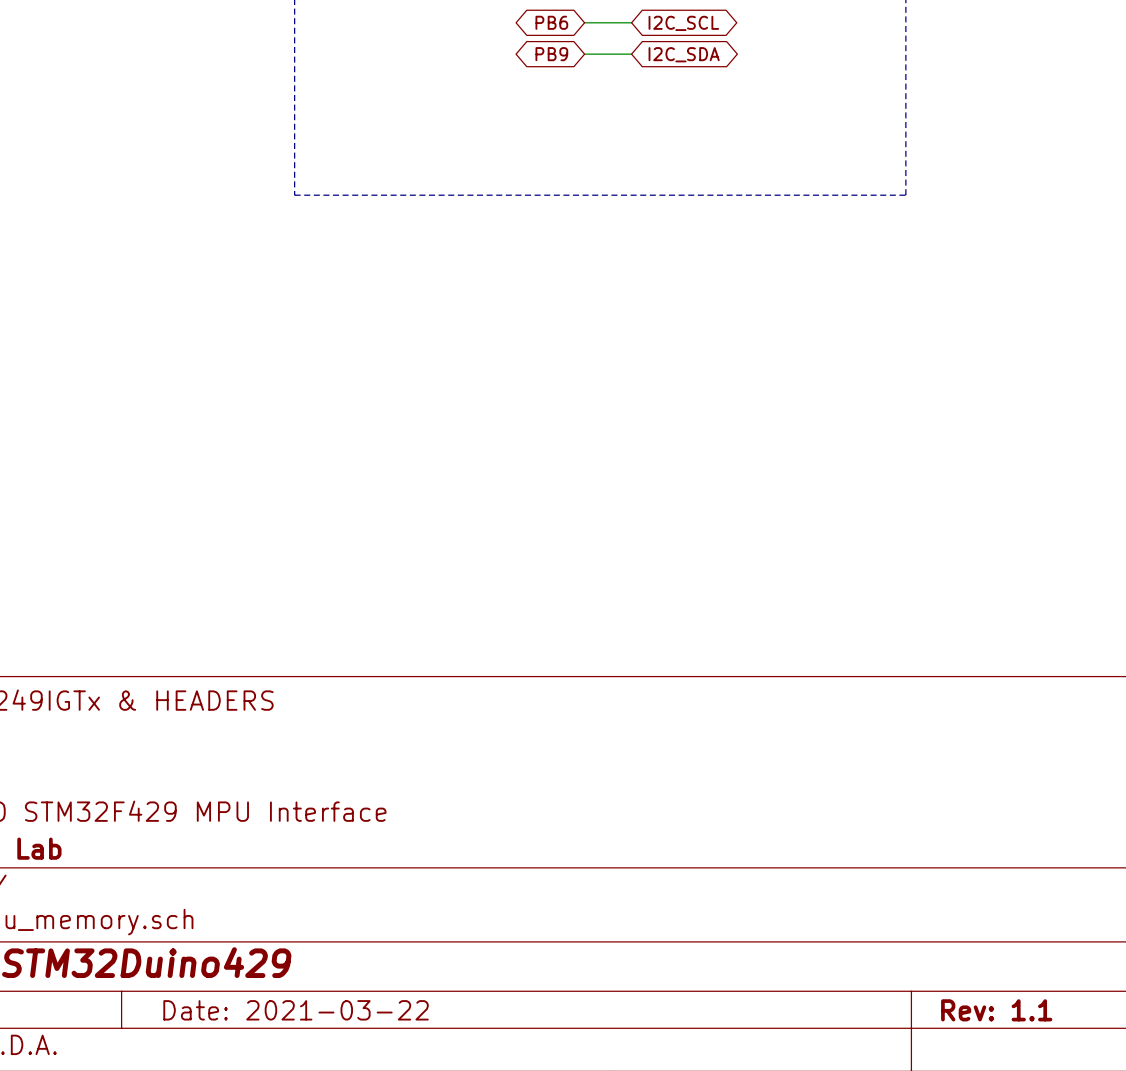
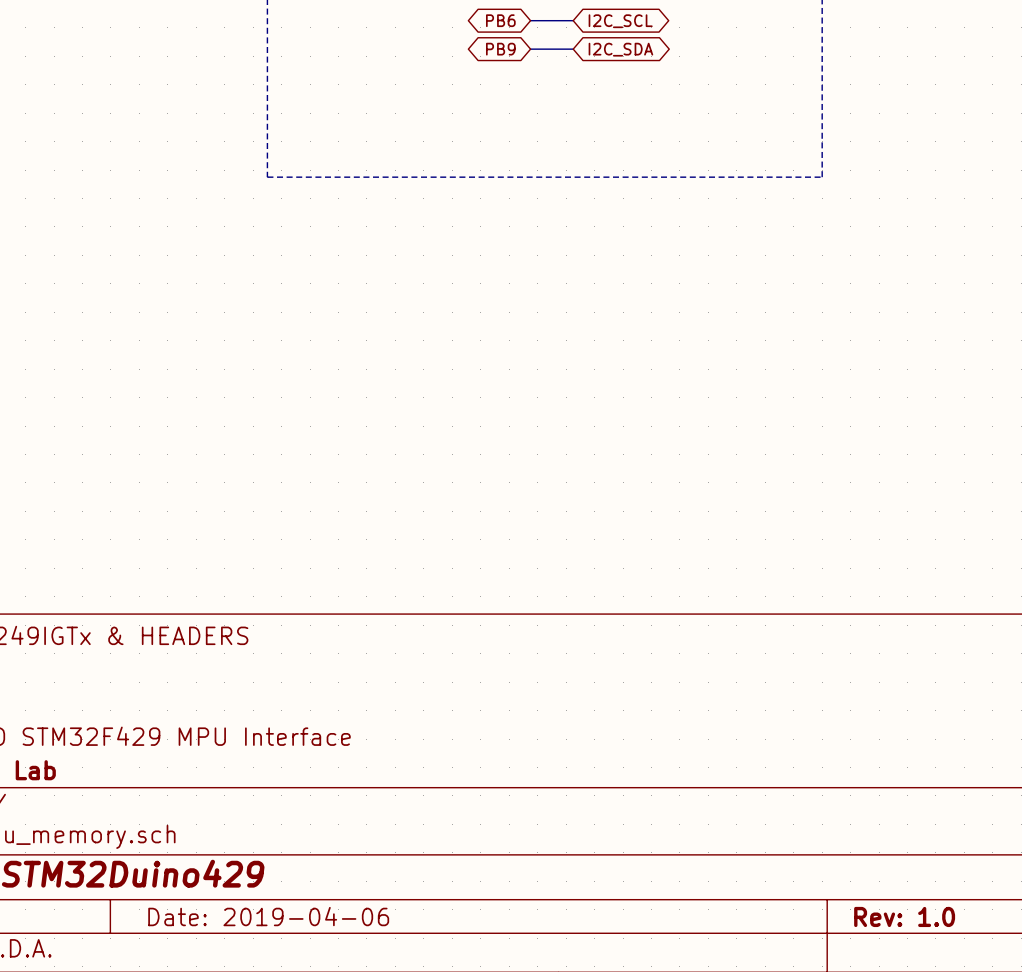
title block: Date: 2021-03-22 (296, 1010) -> Date: 2019-04-06 (268, 916)
title block: Rev: 1.1 (996, 1010) -> Rev: 1.0 (904, 916)

